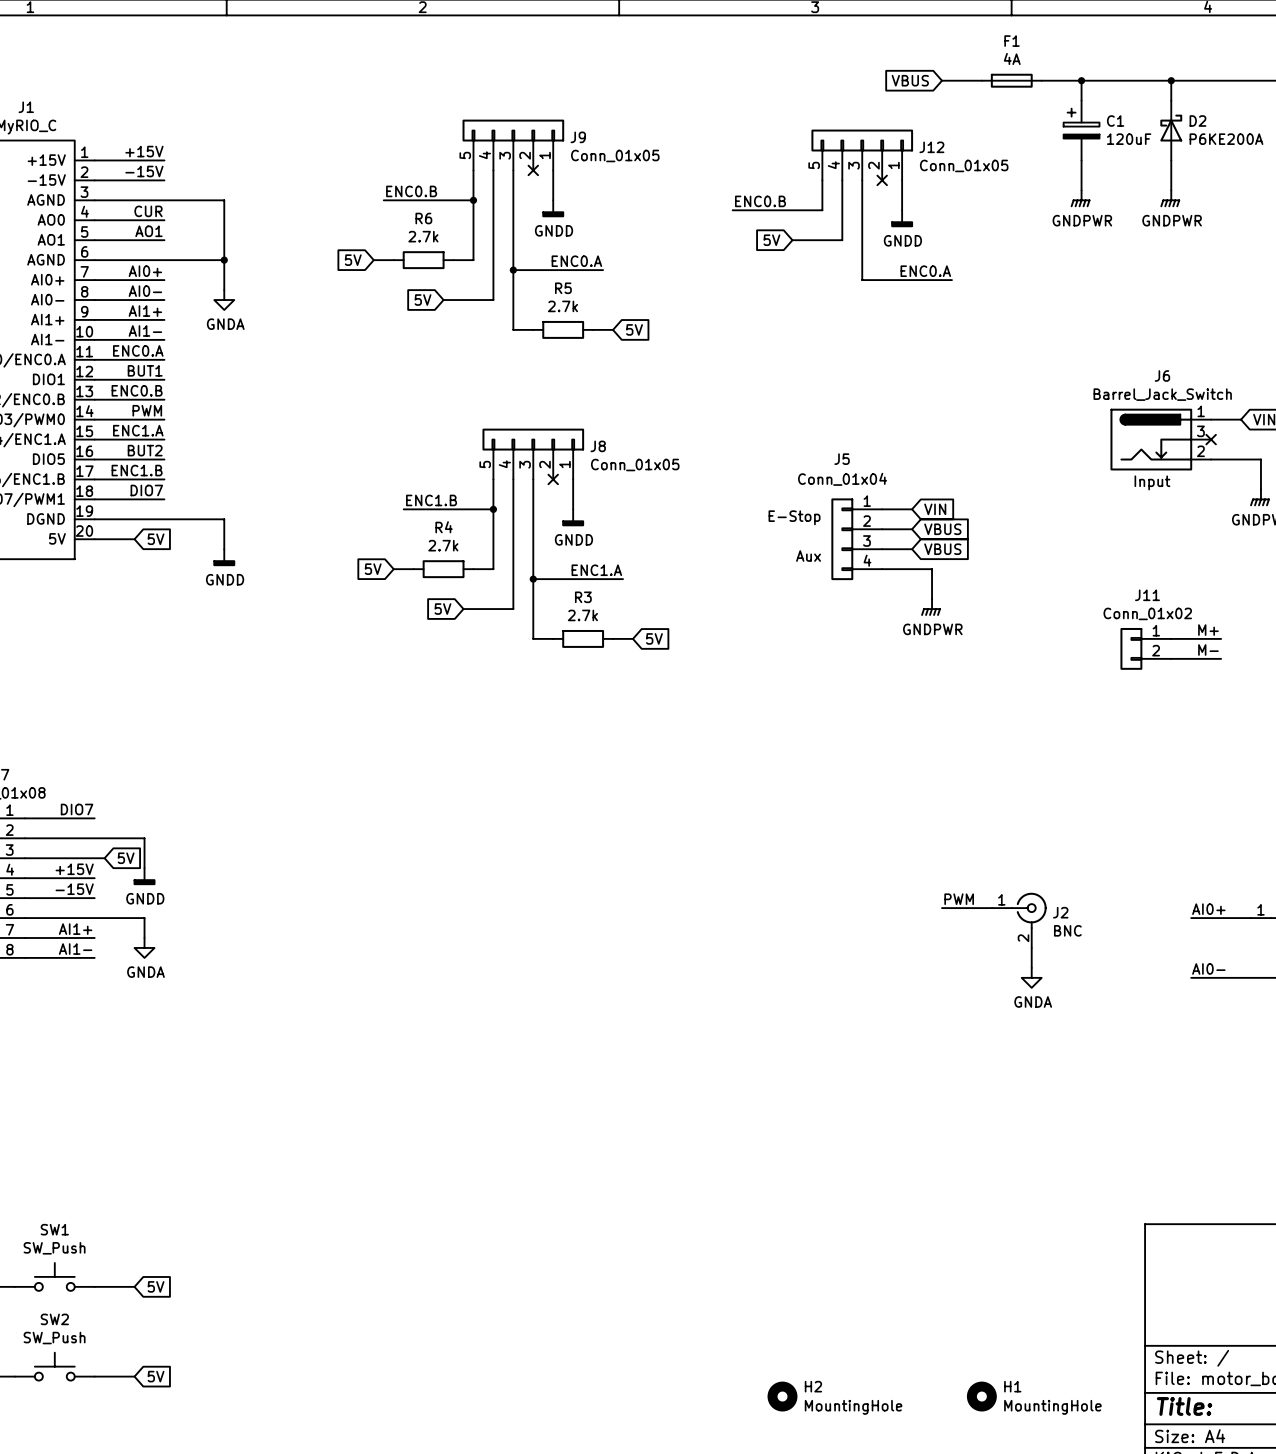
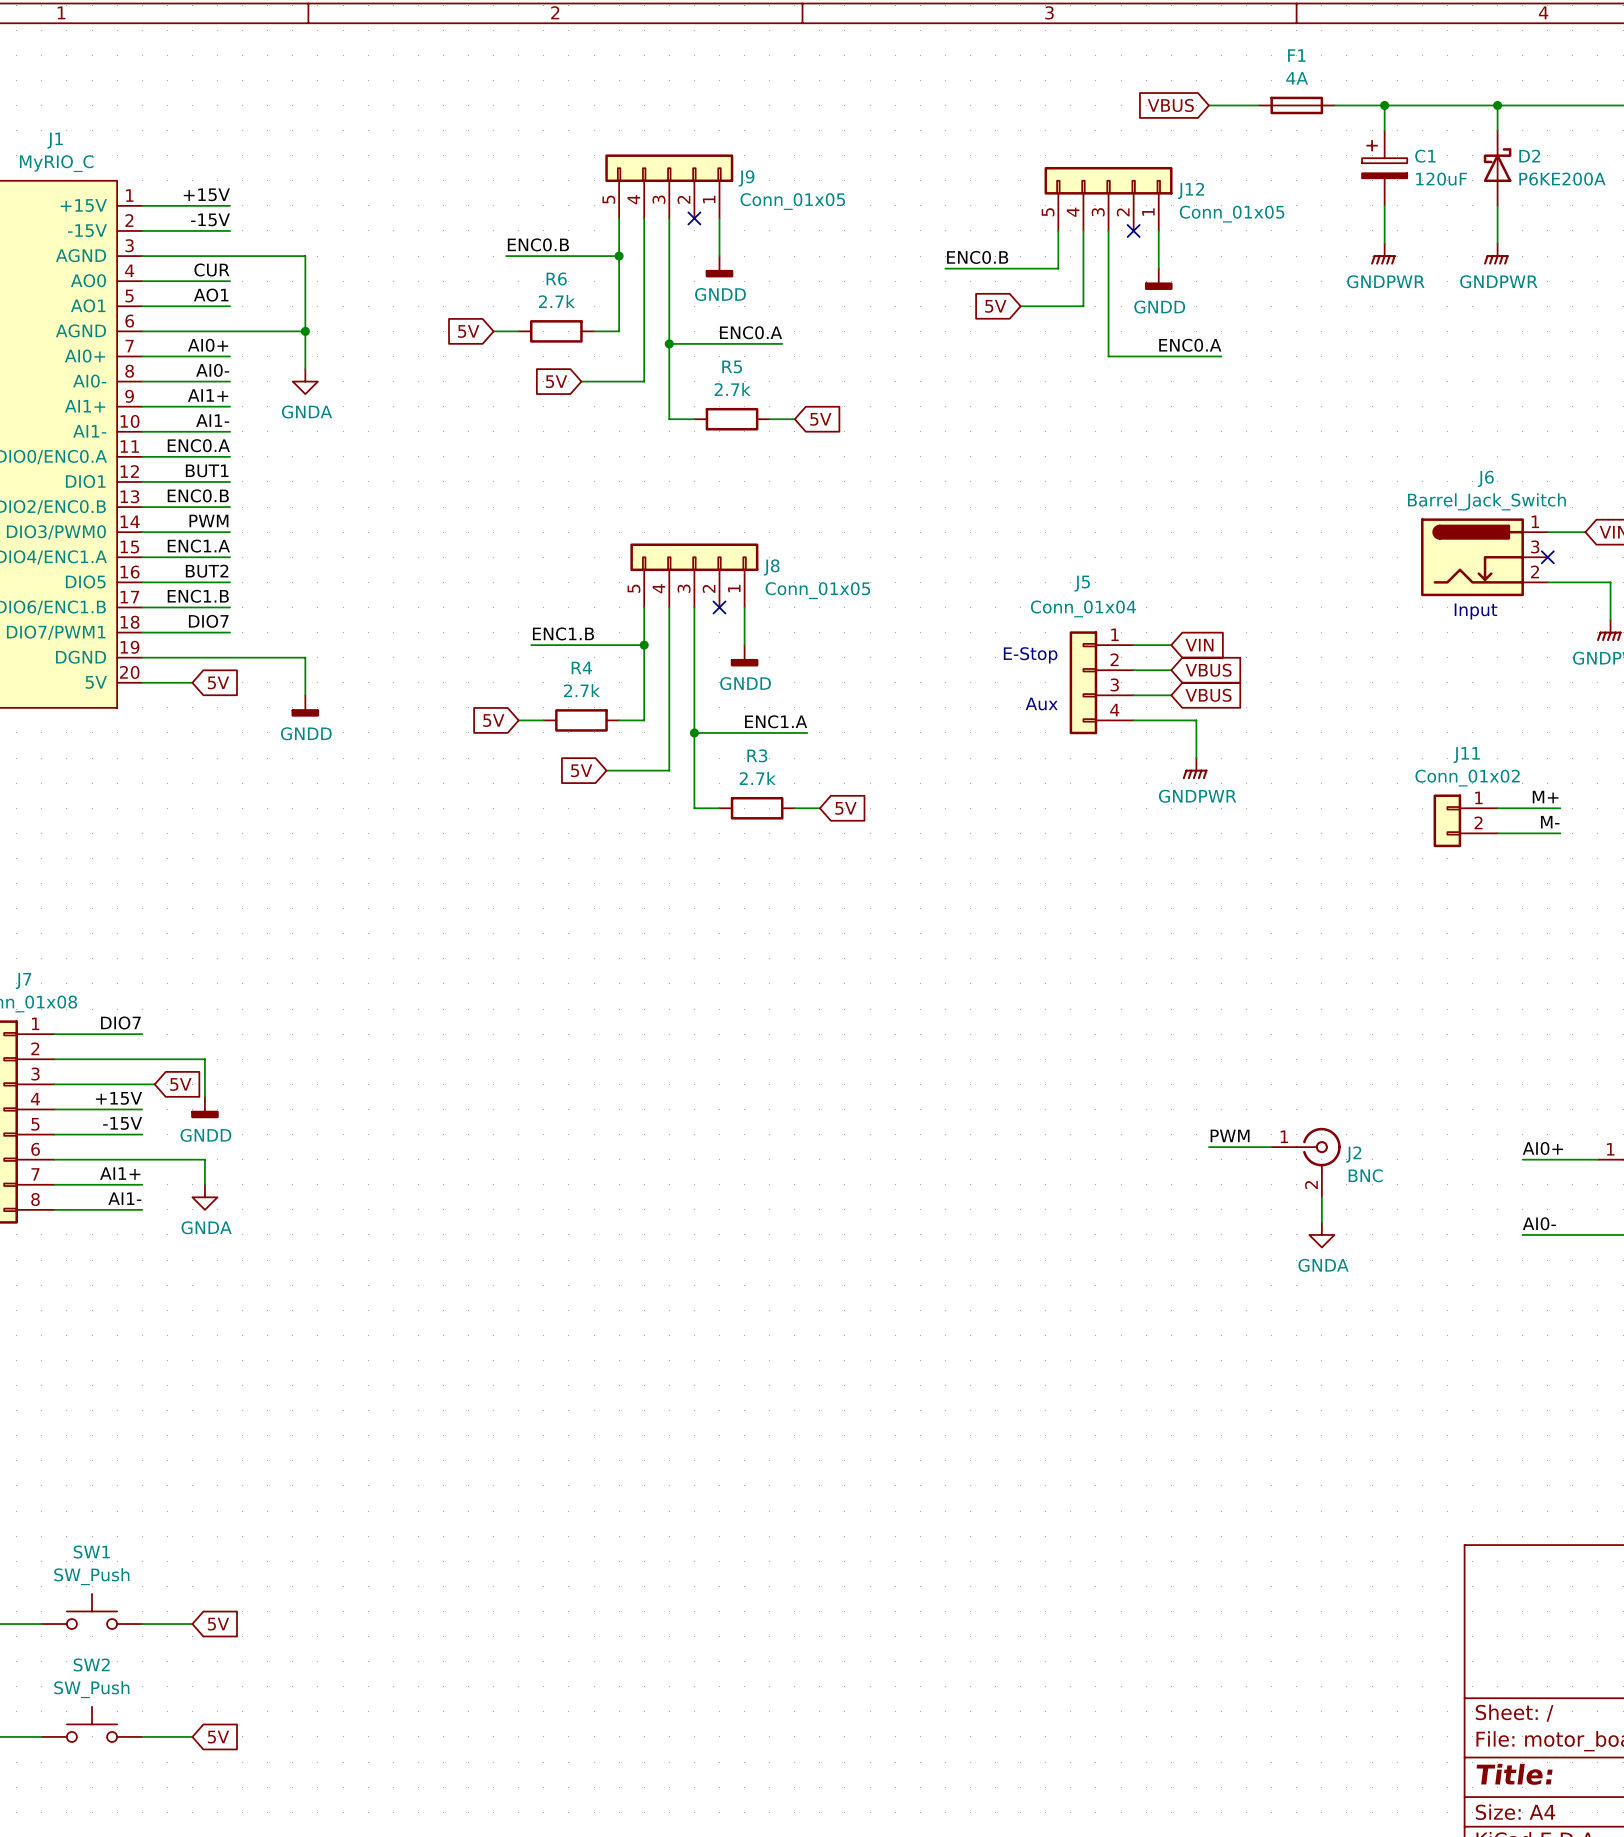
H2: MountingHole (782, 1396) -> none
H1: MountingHole (981, 1396) -> none

